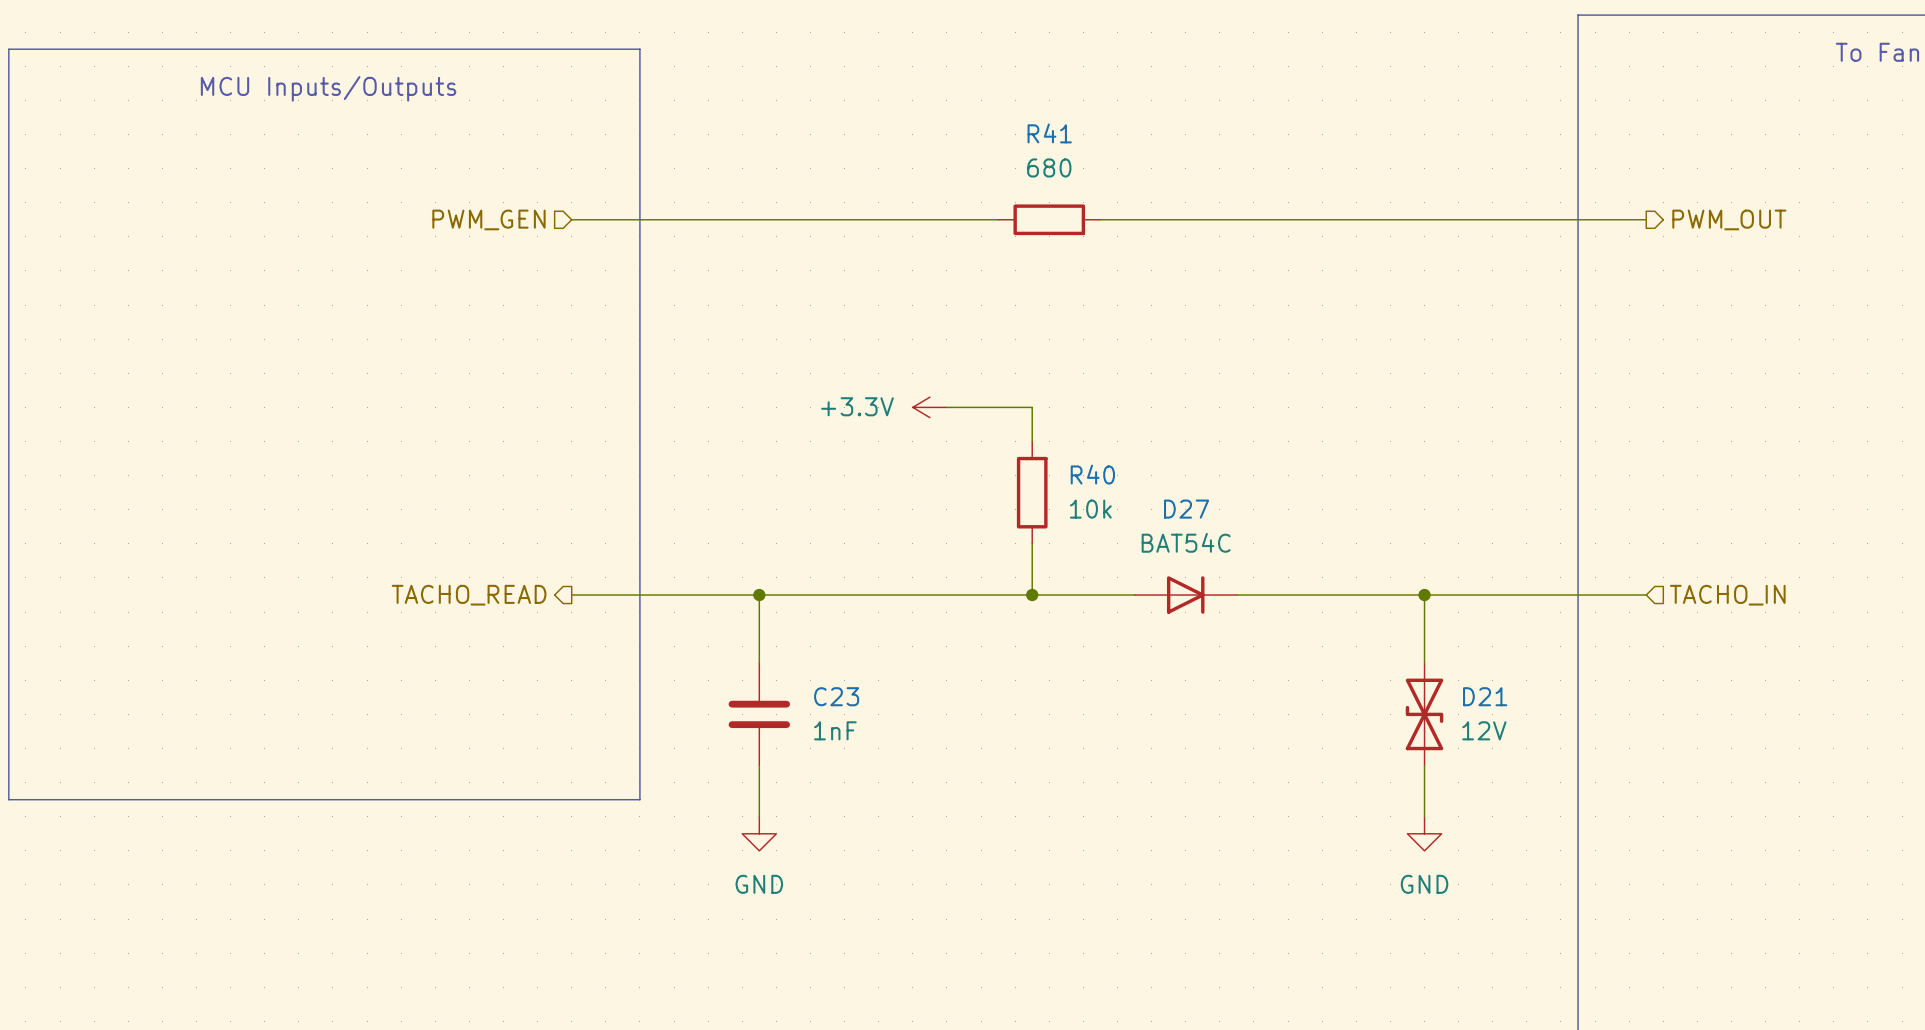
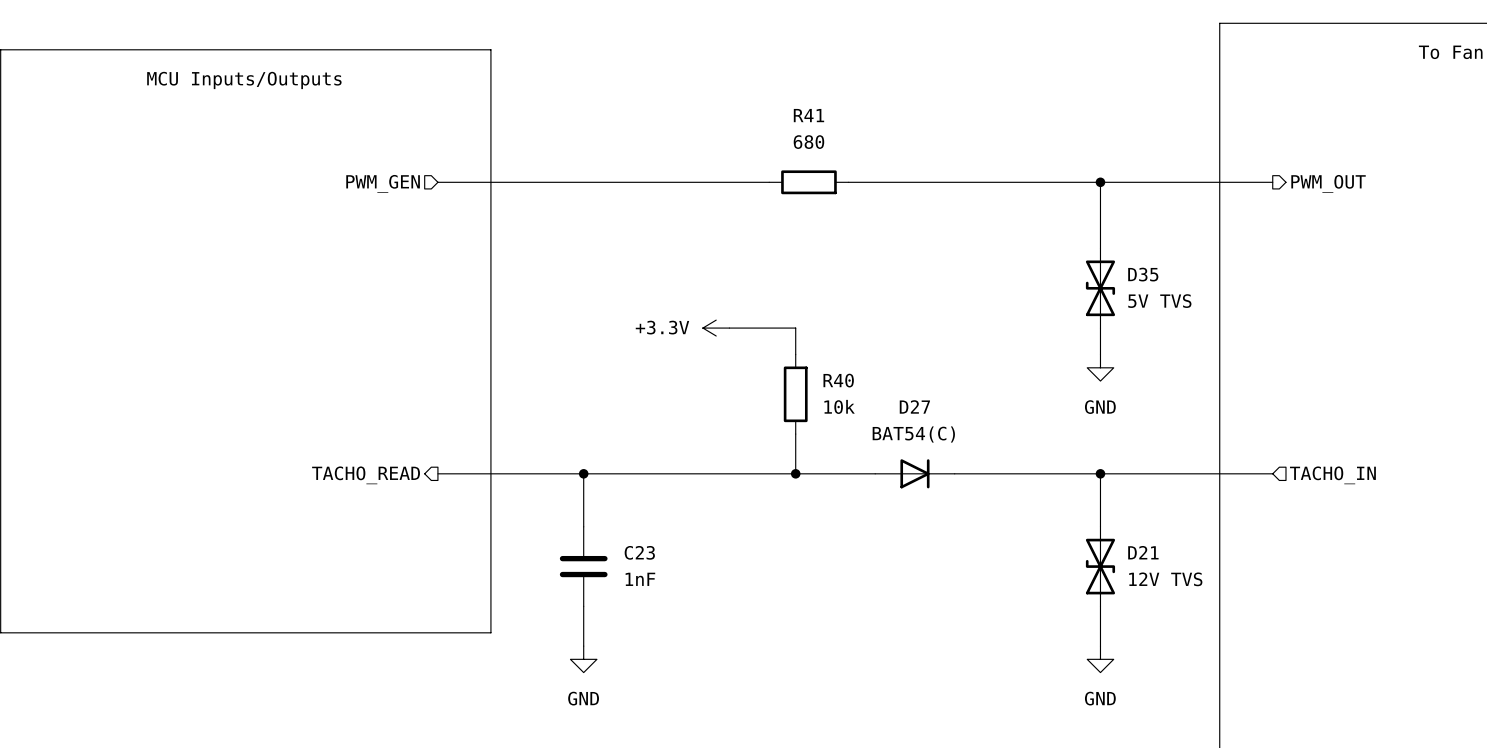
wire: none -> (1100, 182) (1100, 248)
junction: none -> (1100, 182)
D35: none -> 5V TVS (1100, 288)
wire: none -> (1100, 328) (1100, 354)
power symbol: none -> GND (1100, 367)
D27 value: BAT54C (1186, 542) -> BAT54(C) (913, 434)
D21 value: 12V (1484, 730) -> 12V TVS (1165, 579)

